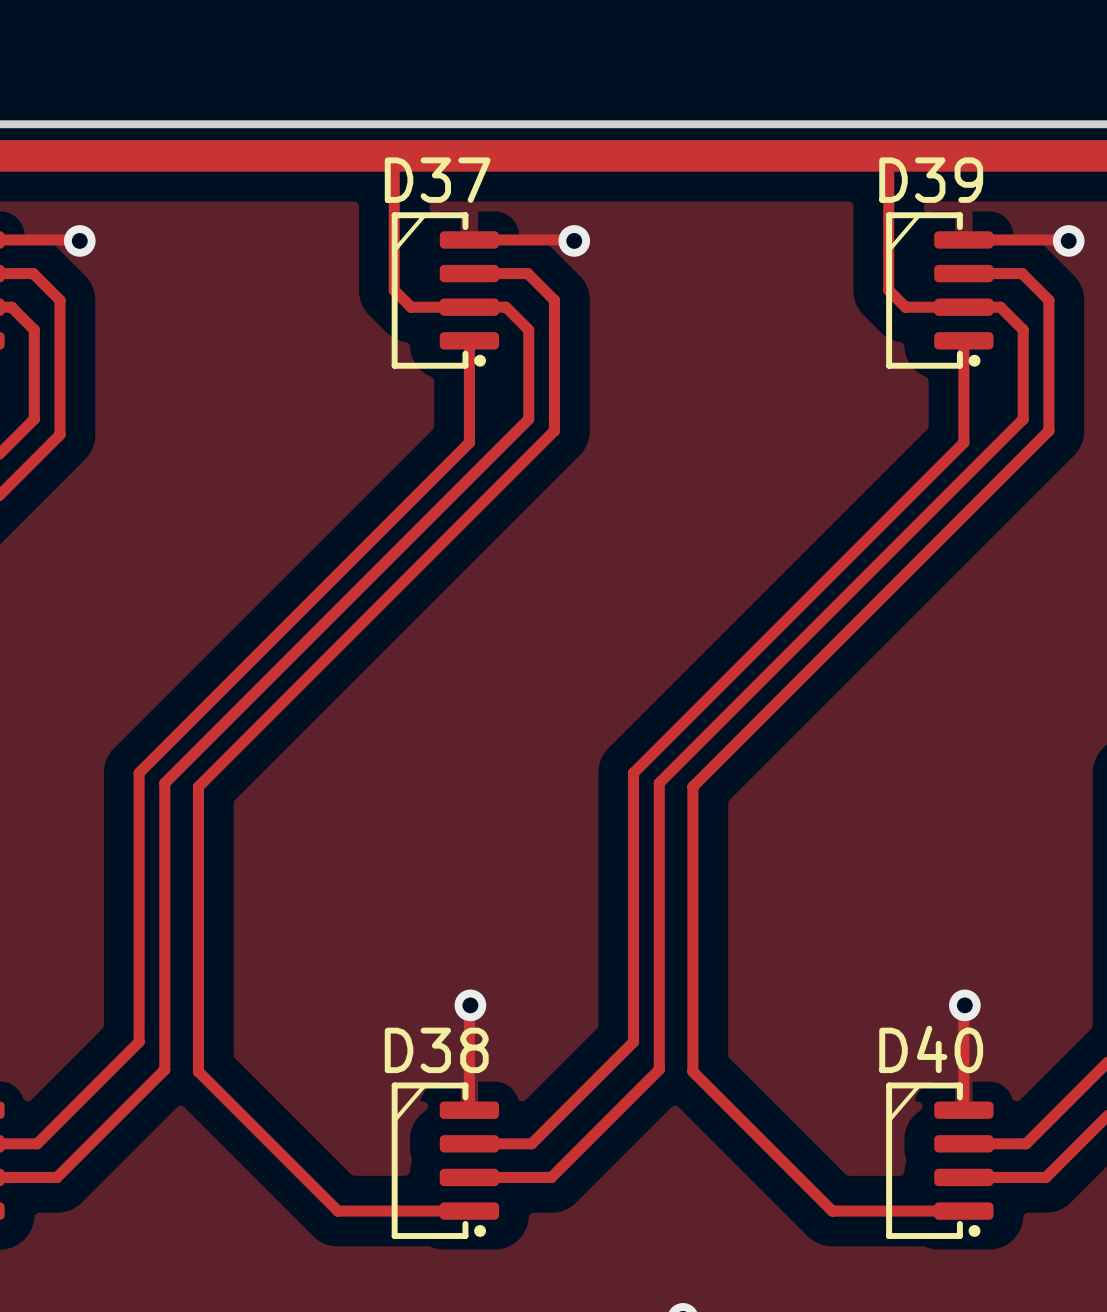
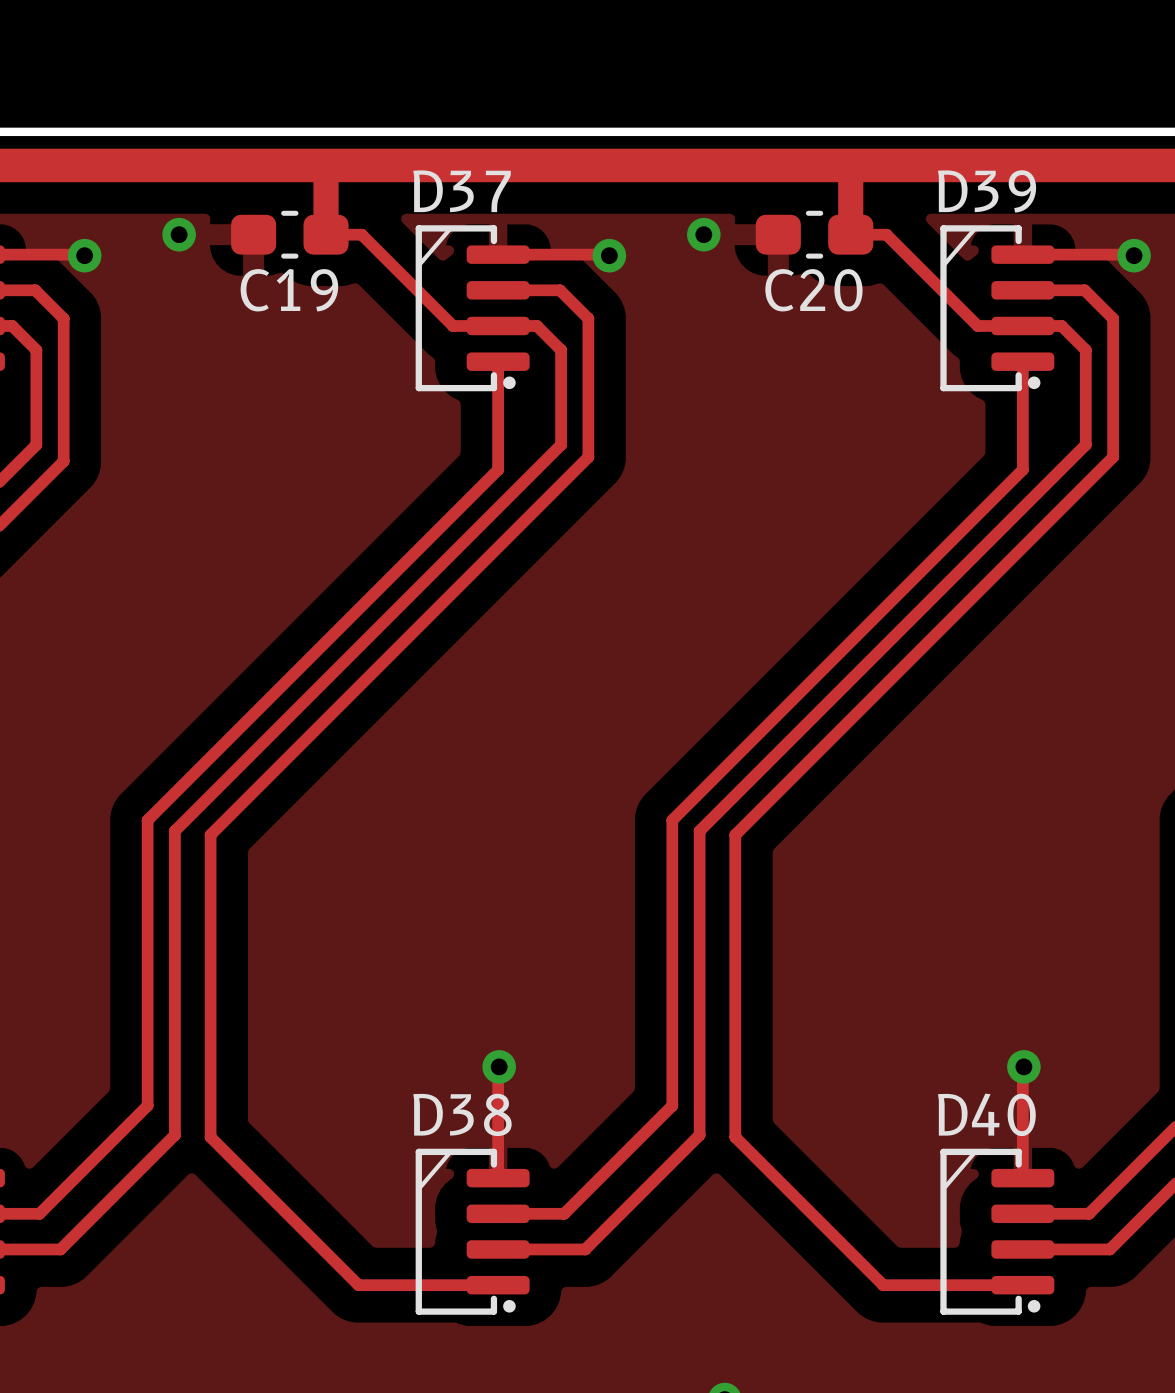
track: (394, 155) (394, 290) (411, 307) (426, 307) -> (326, 165) (326, 234) (361, 234) (453, 325)
track: (888, 155) (888, 290) (905, 307) (921, 307) -> (850, 165) (850, 234) (886, 234) (977, 325)
via: none -> (179, 234)
C19: none -> (289, 234)
via: none -> (703, 234)
C20: none -> (814, 234)

